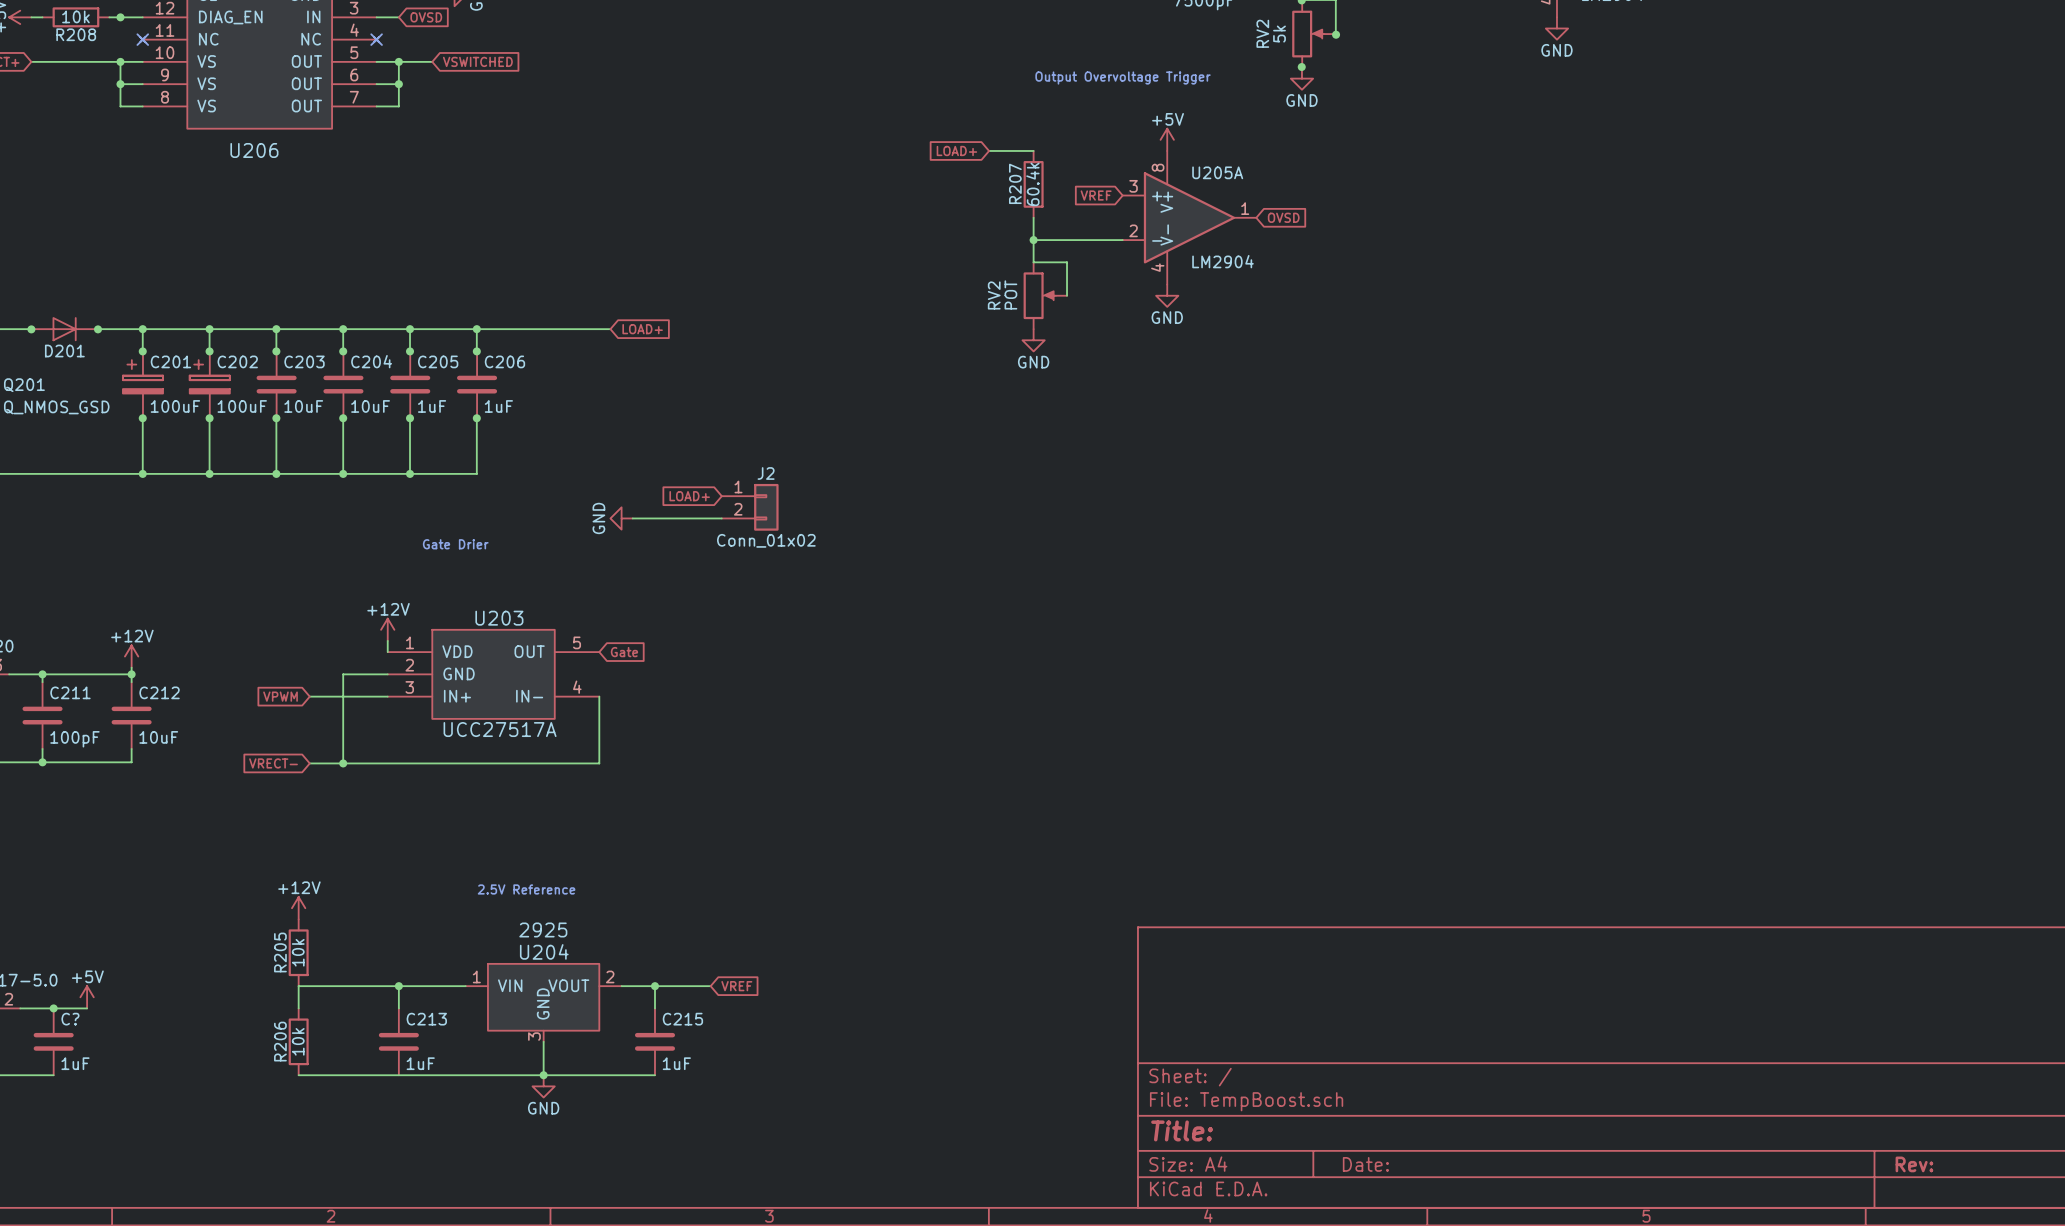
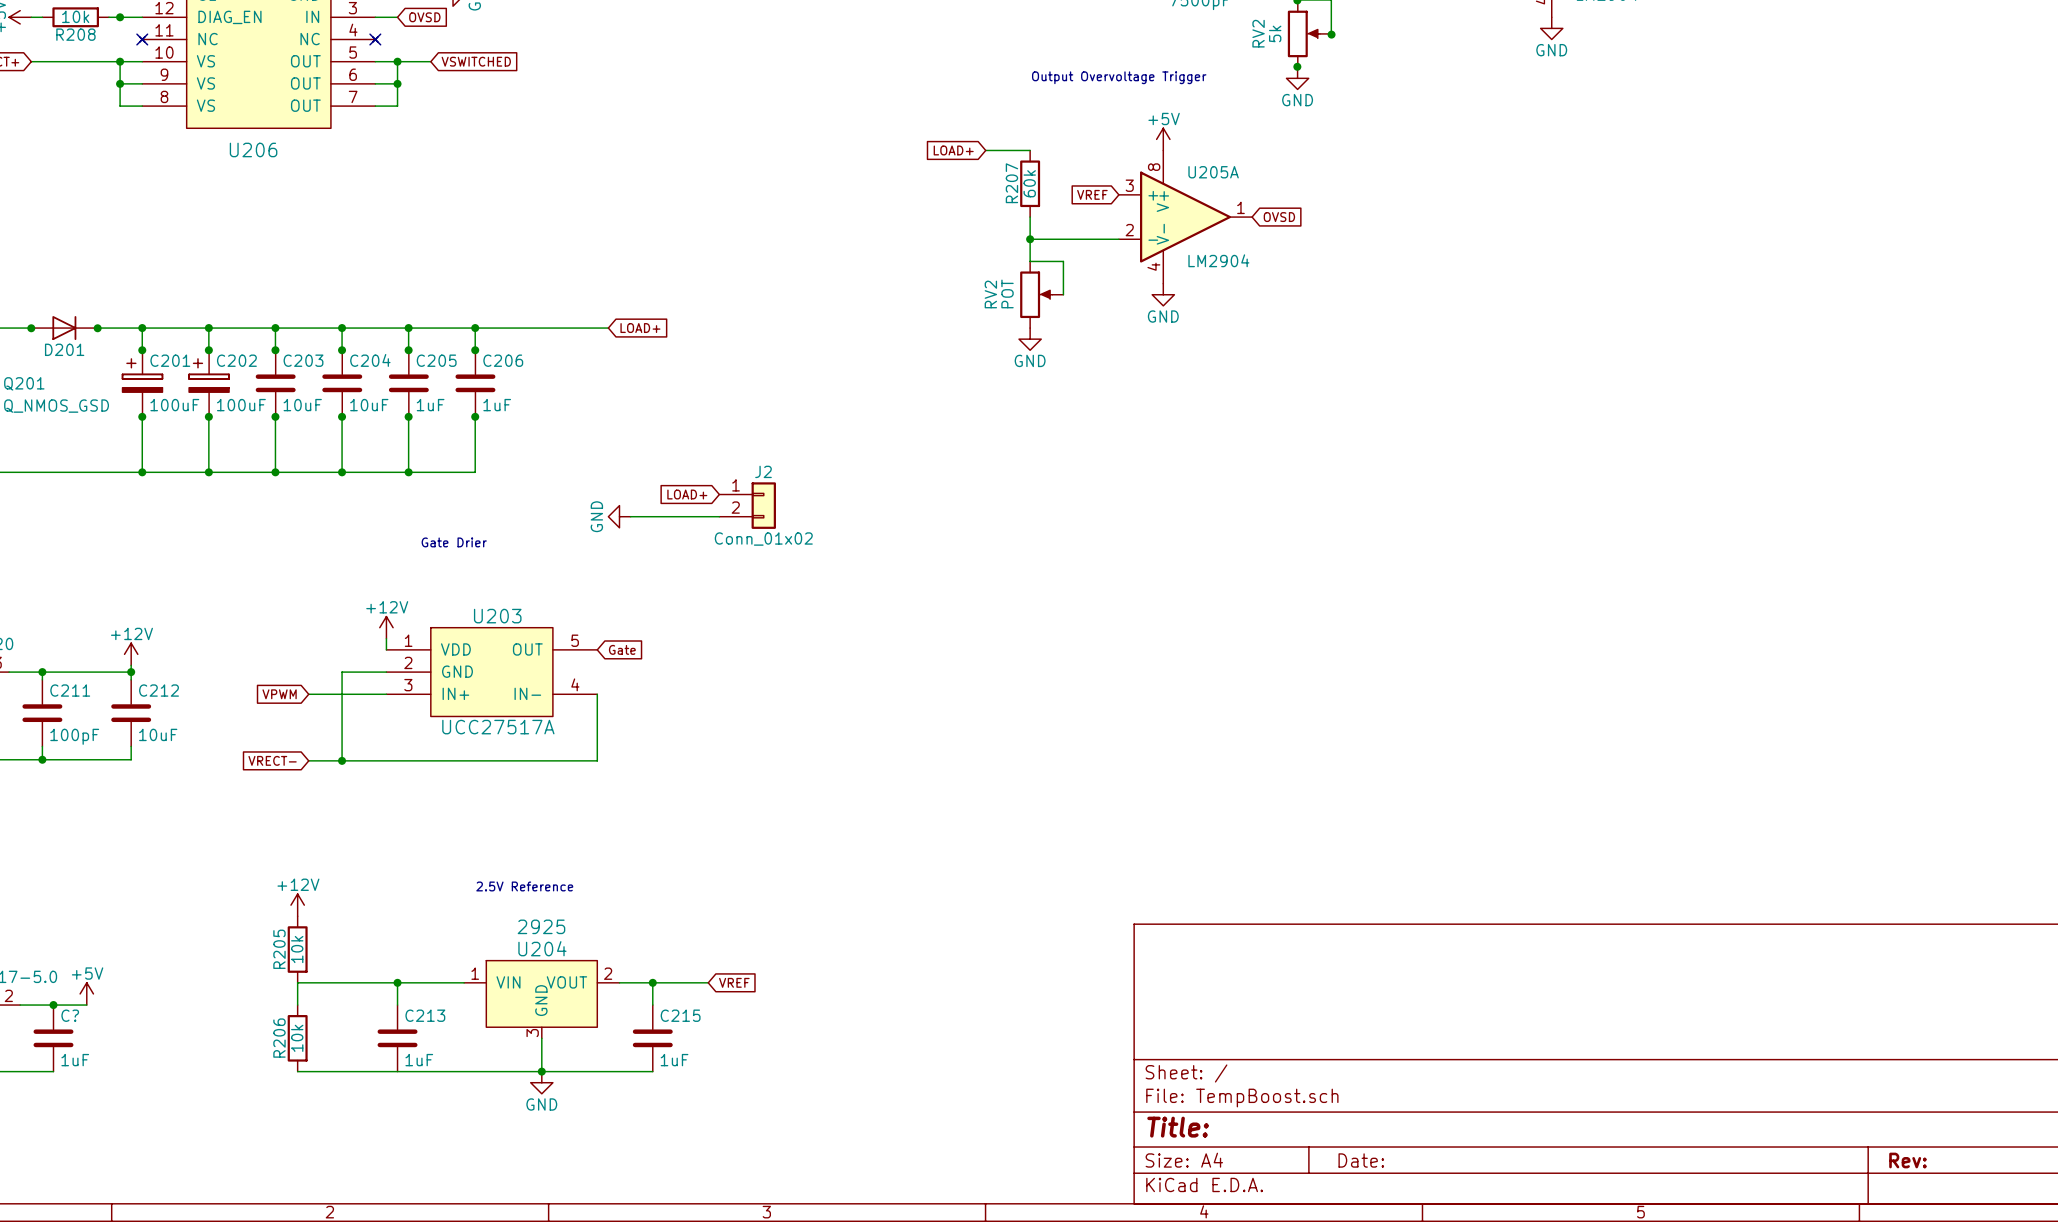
R207 value: 60.4k (1032, 184) -> 60k (1029, 183)

